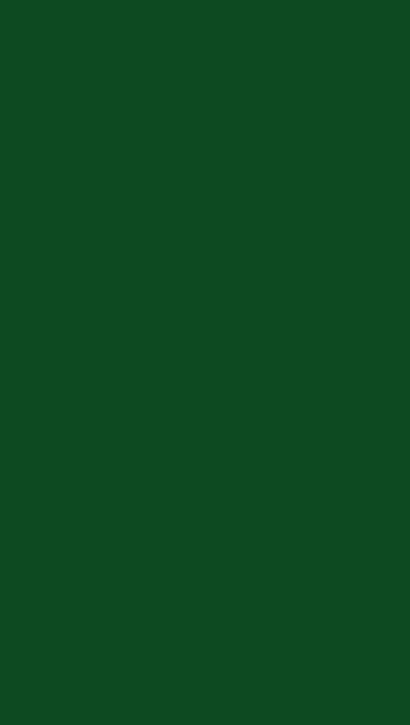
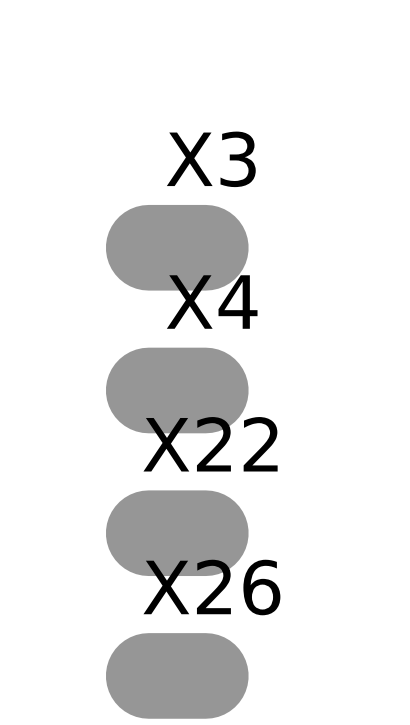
X3: none -> (177, 247)
X4: none -> (177, 390)
X22: none -> (177, 533)
X26: none -> (177, 675)

